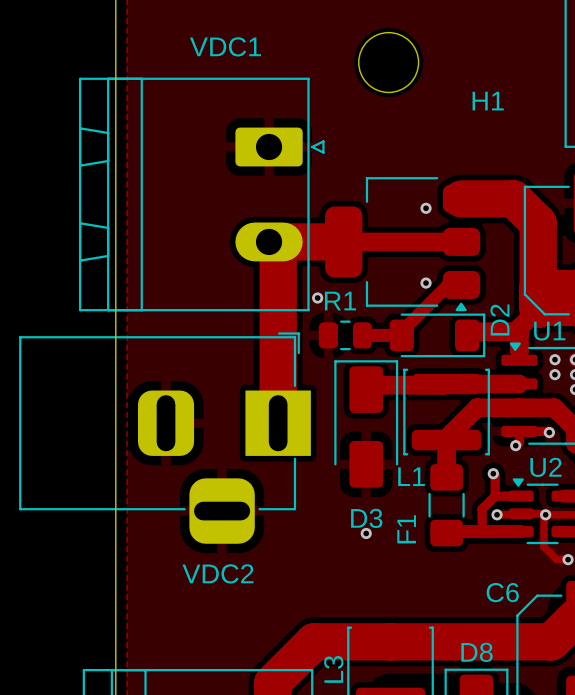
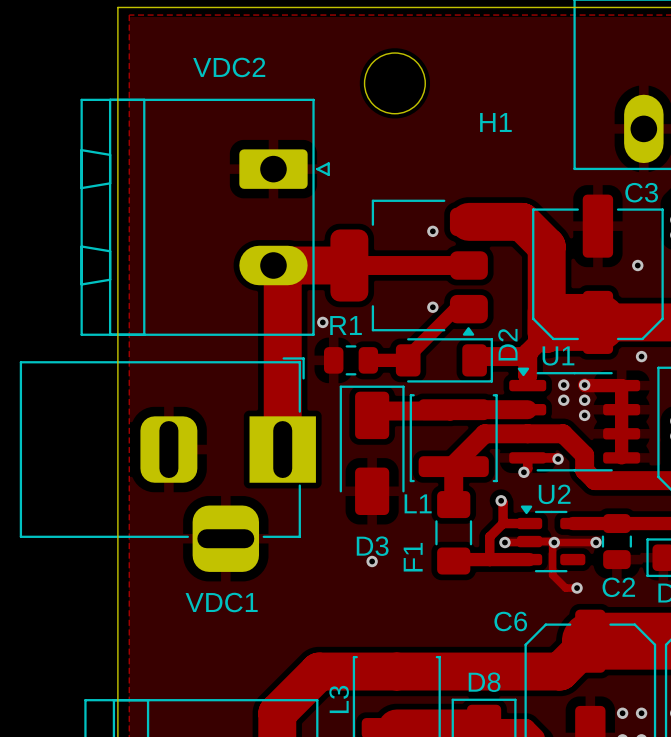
VDC1 name: VDC1 (225, 46) -> VDC2 (229, 67)
VDC2 name: VDC2 (217, 573) -> VDC1 (221, 602)

